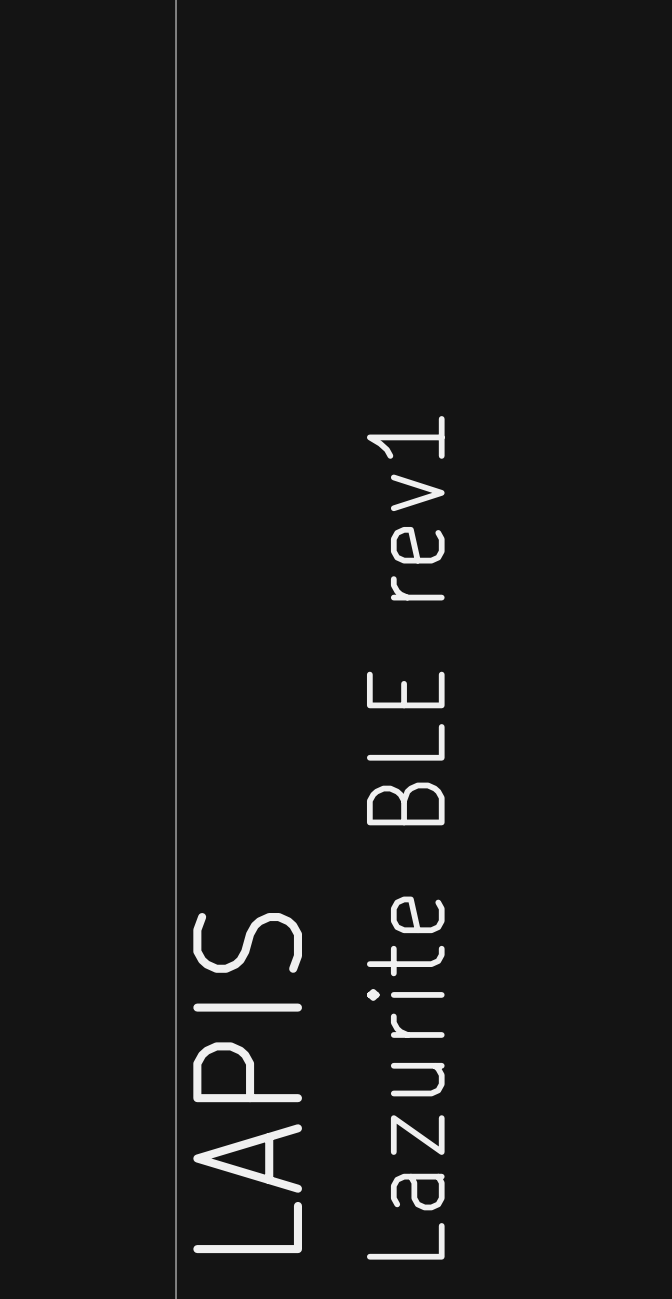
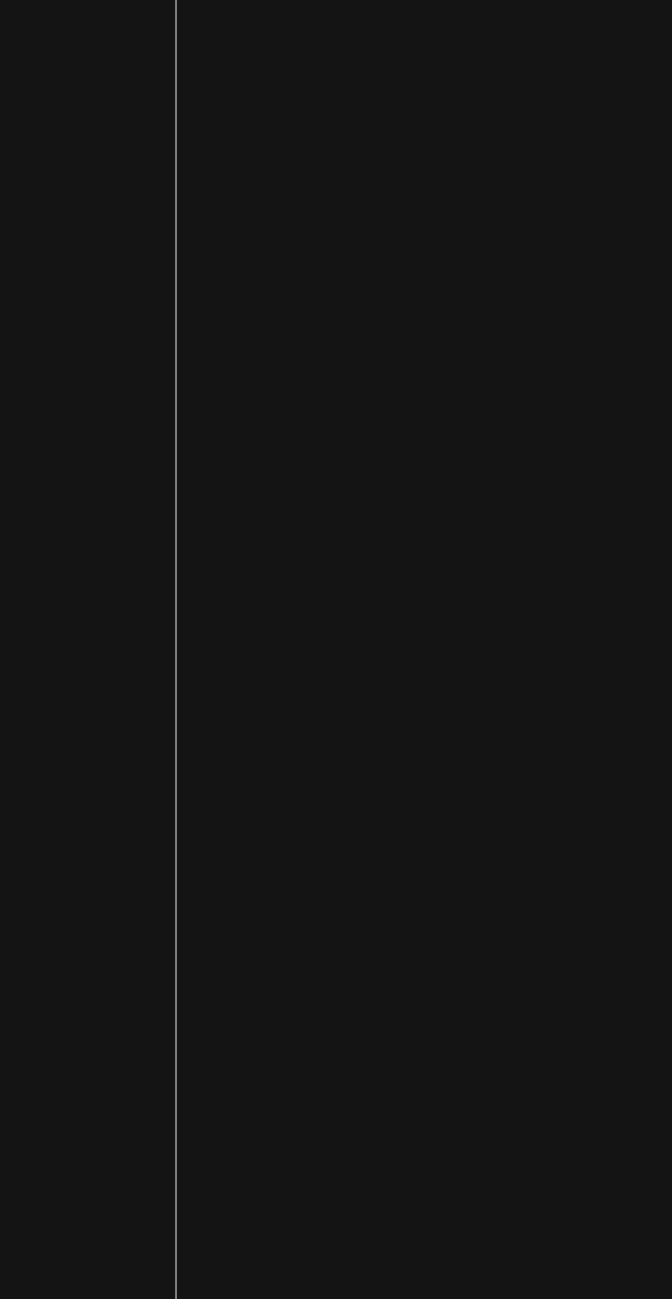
text: Lazurite BLE rev1 (405, 837) -> none
text: LAPIS (247, 1083) -> none

